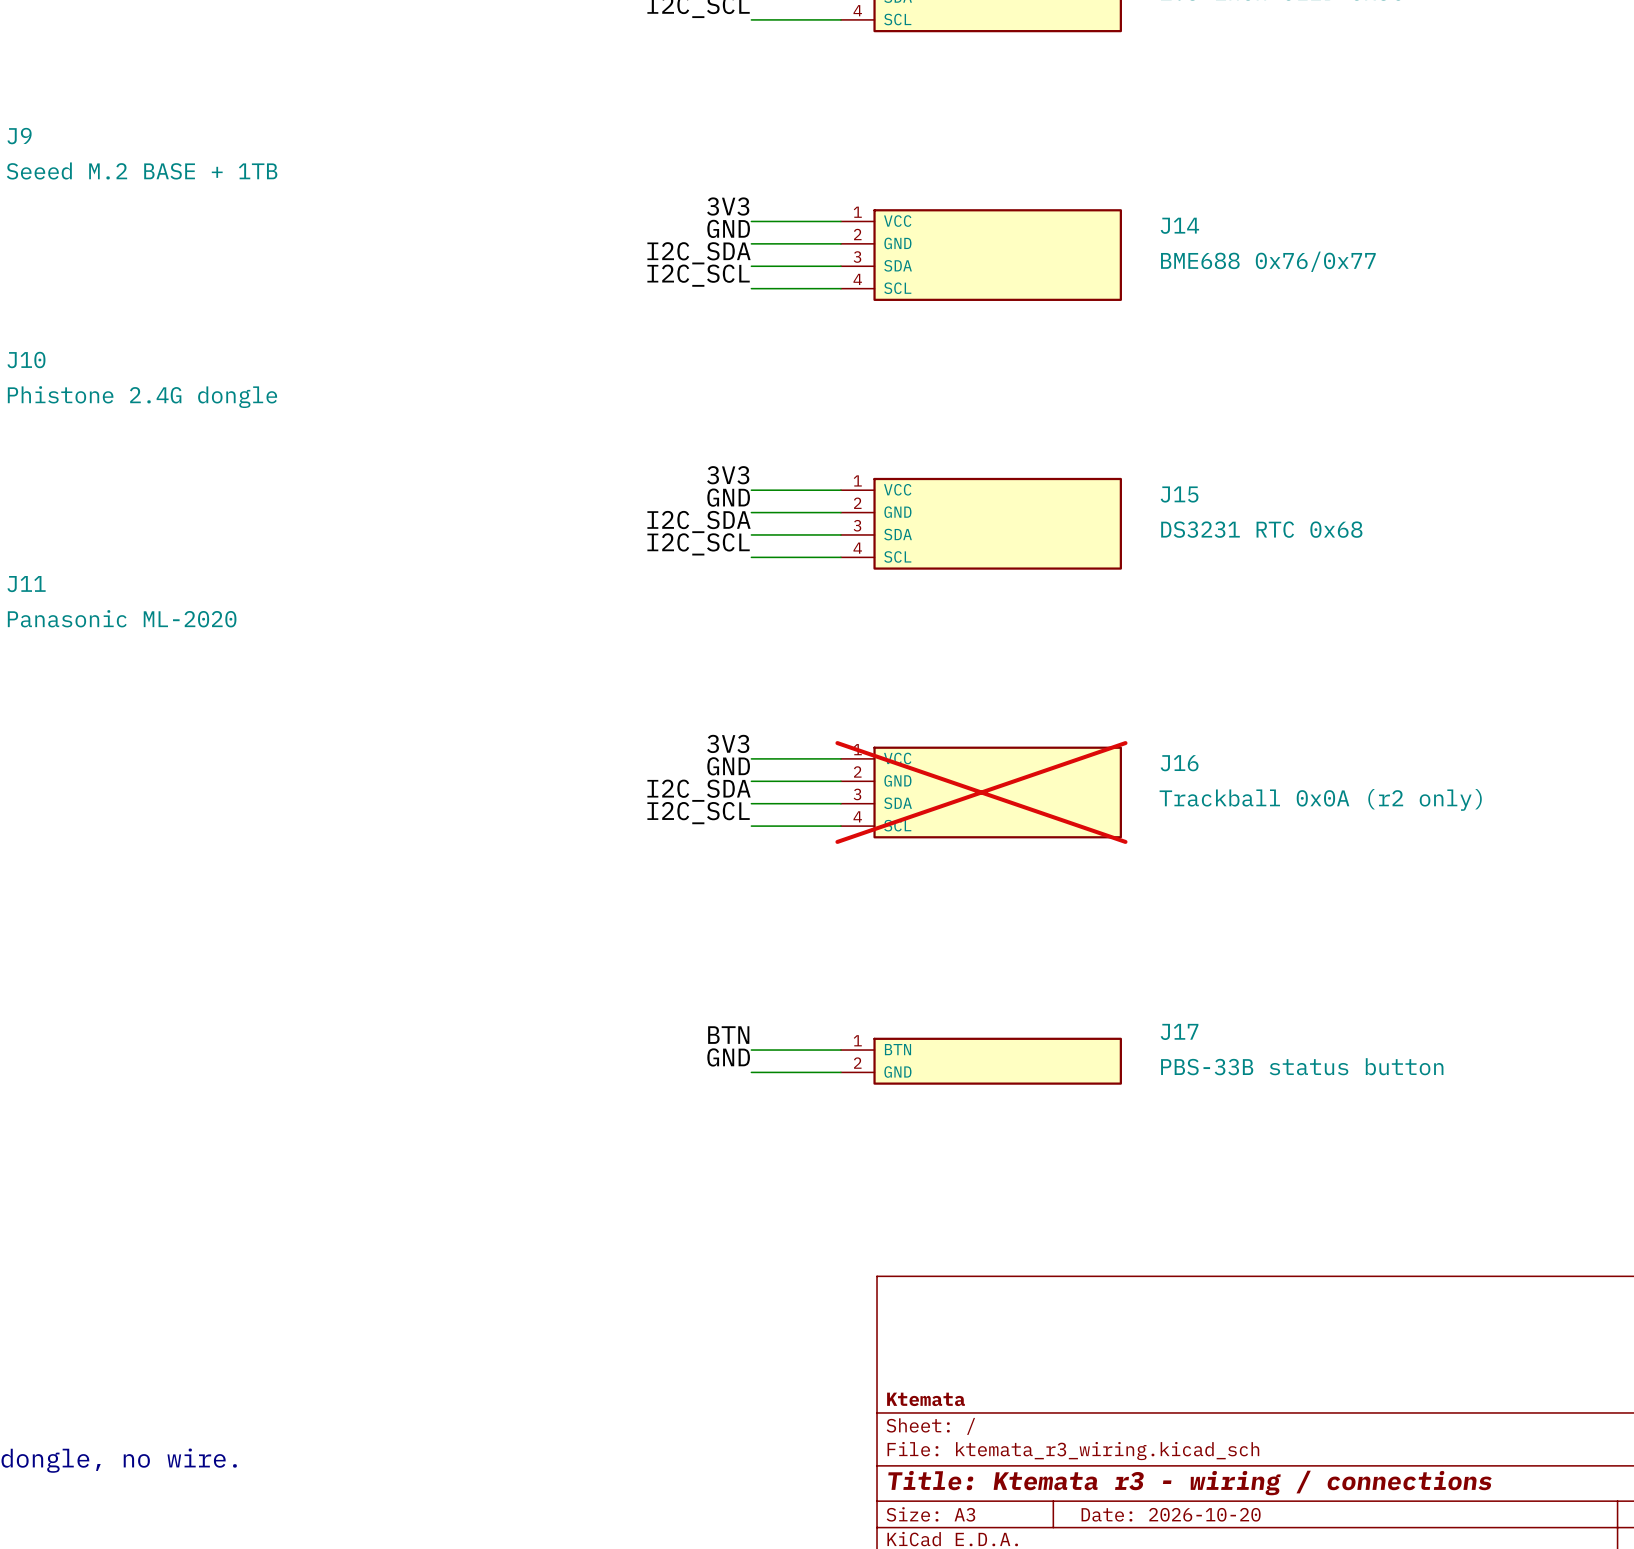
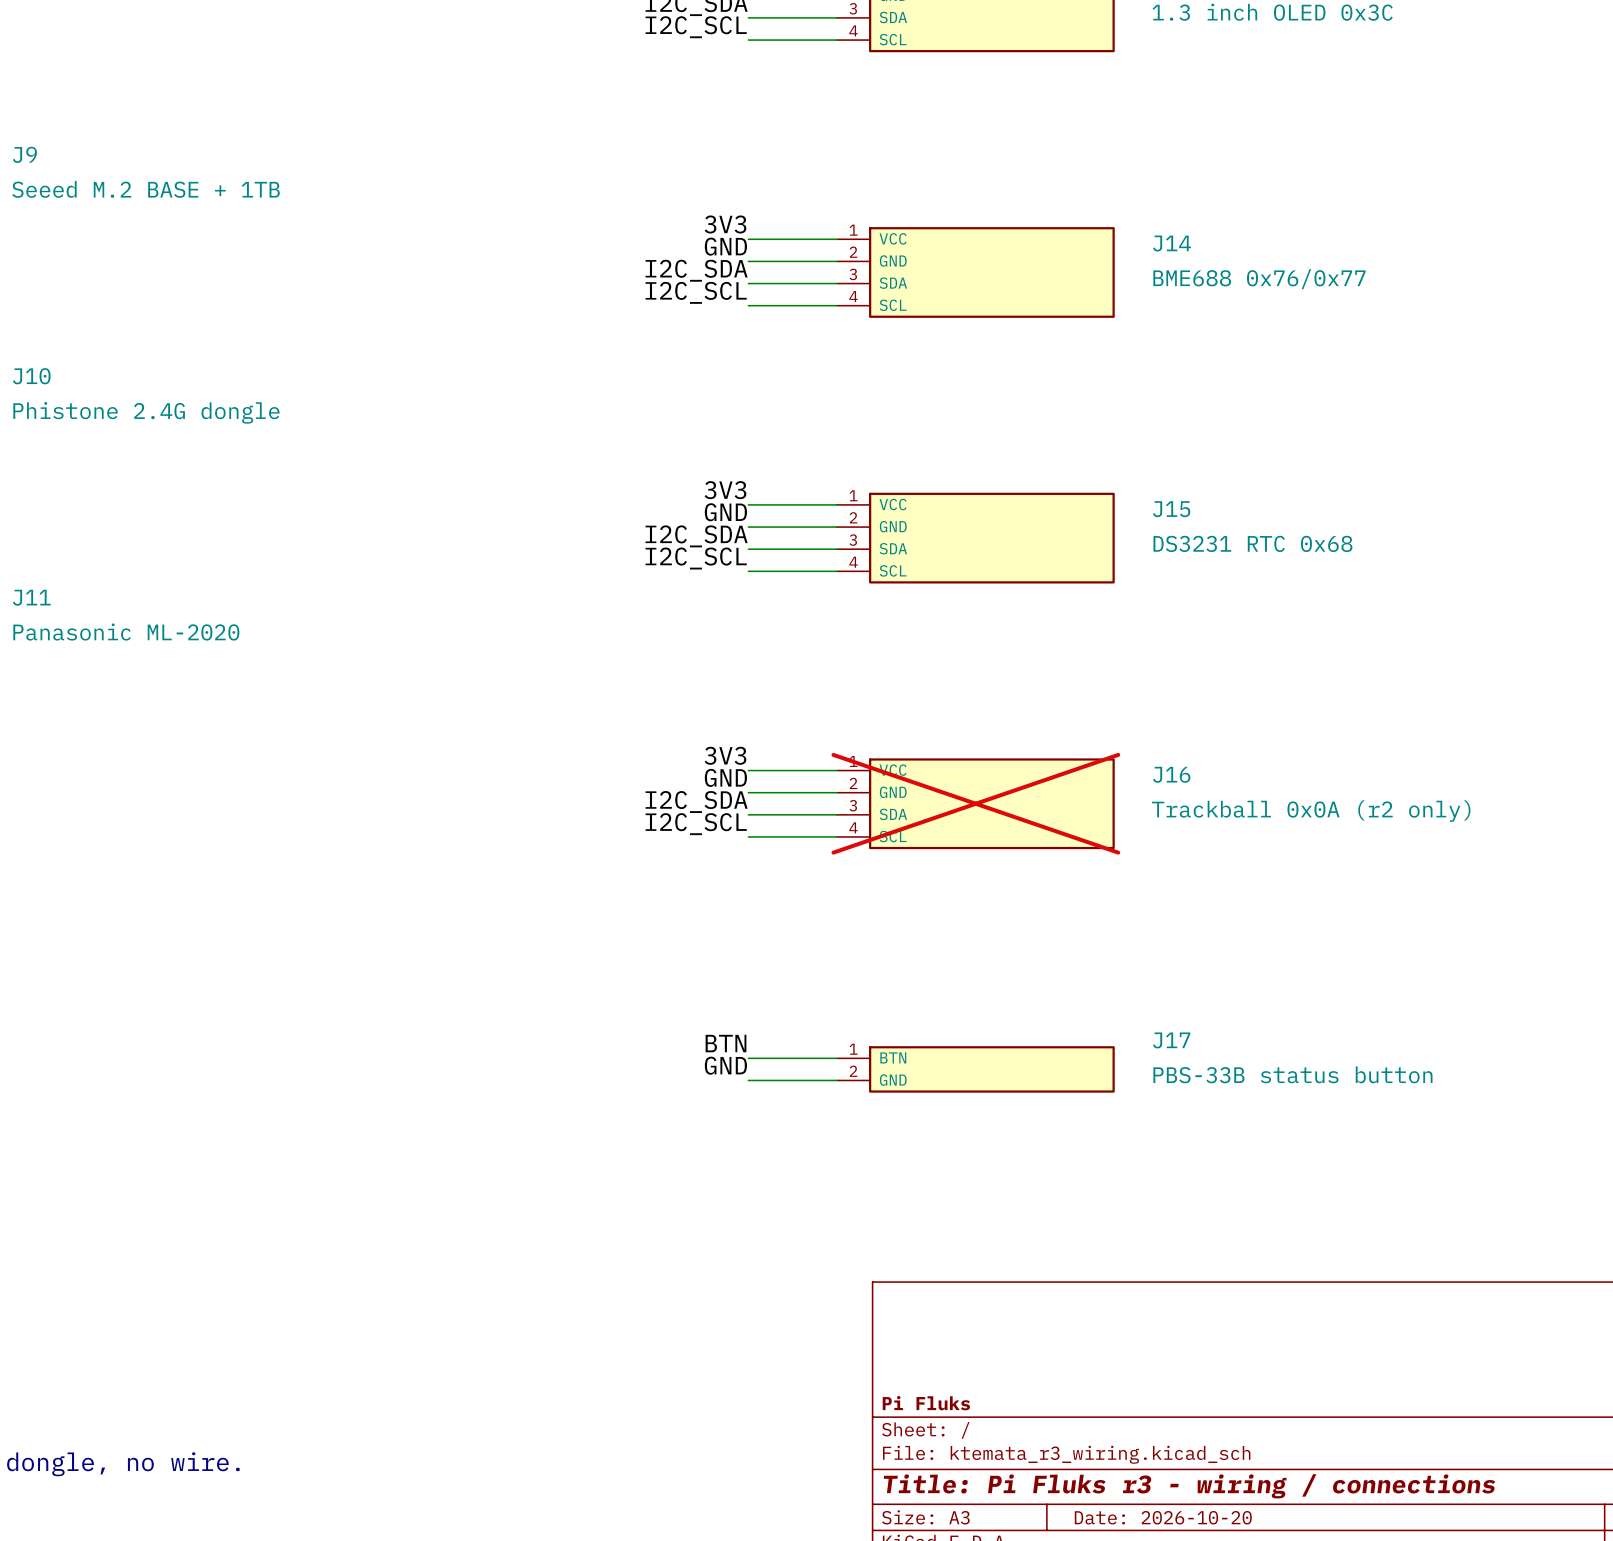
title block: Ktemata (925, 1399) -> Pi Fluks (926, 1403)
title block: Title: Ktemata r3 - wiring / connections (1189, 1482) -> Title: Pi Fluks r3 - wiring / connections (1189, 1486)

